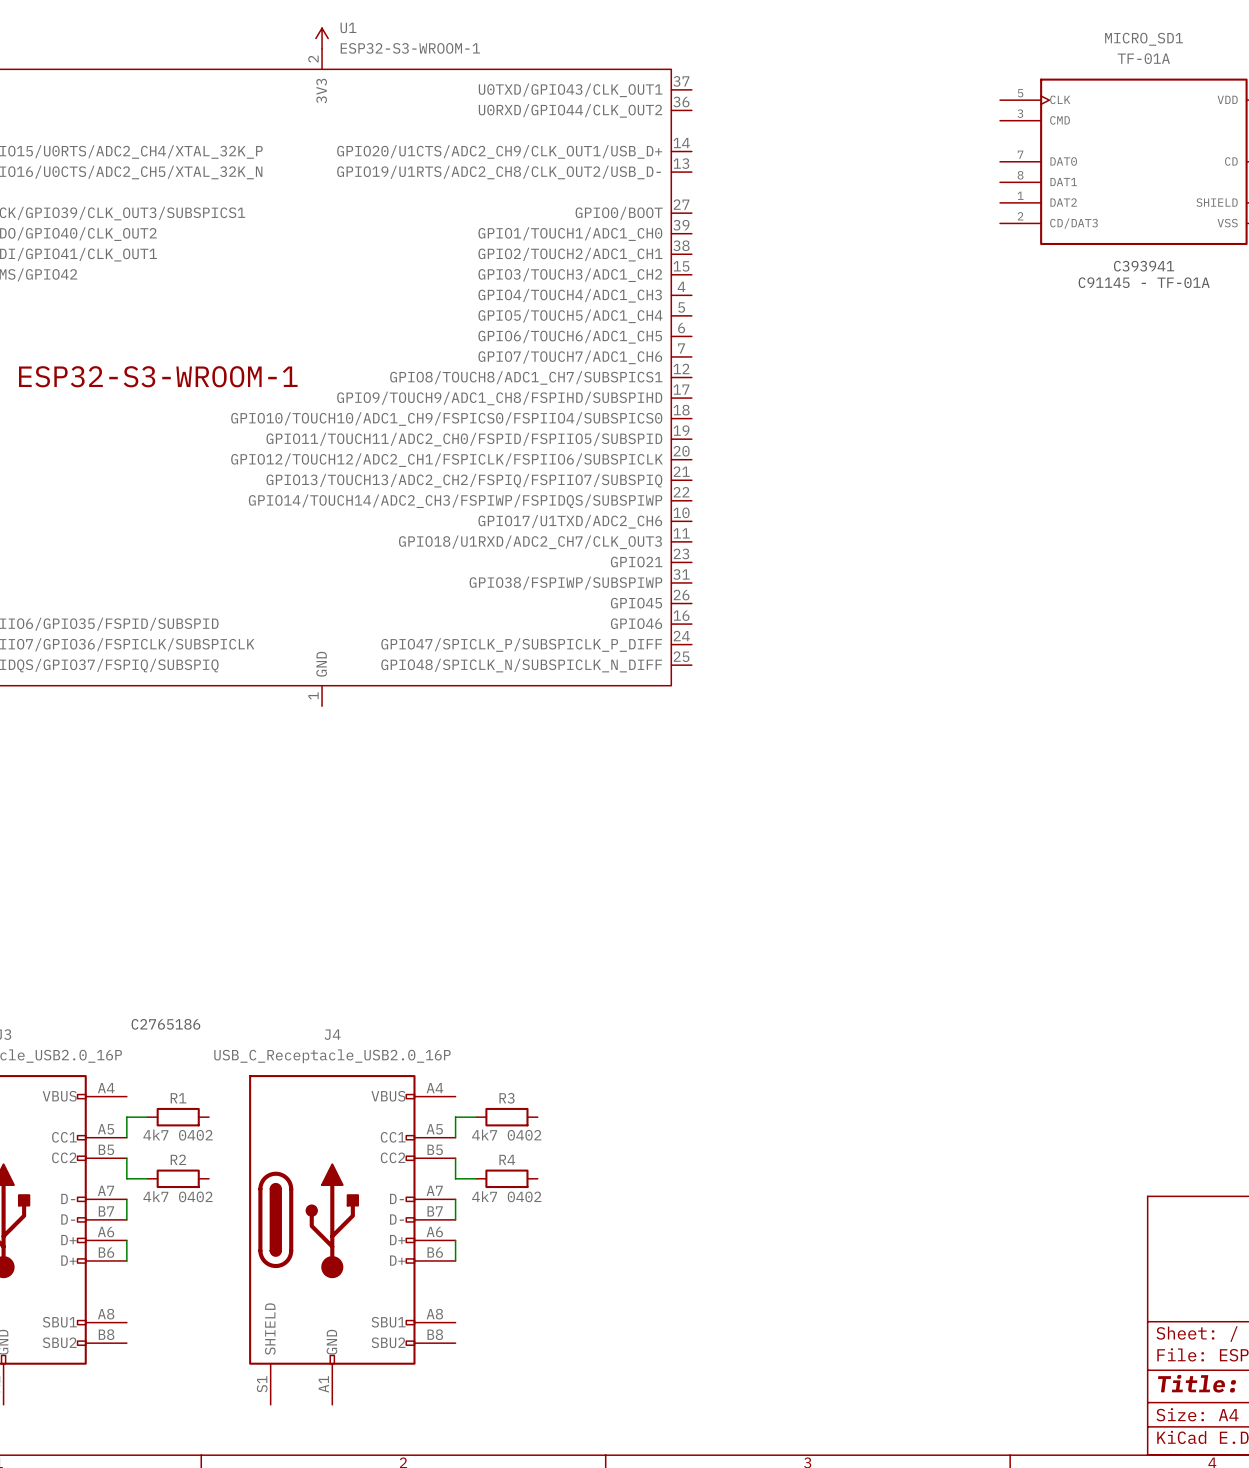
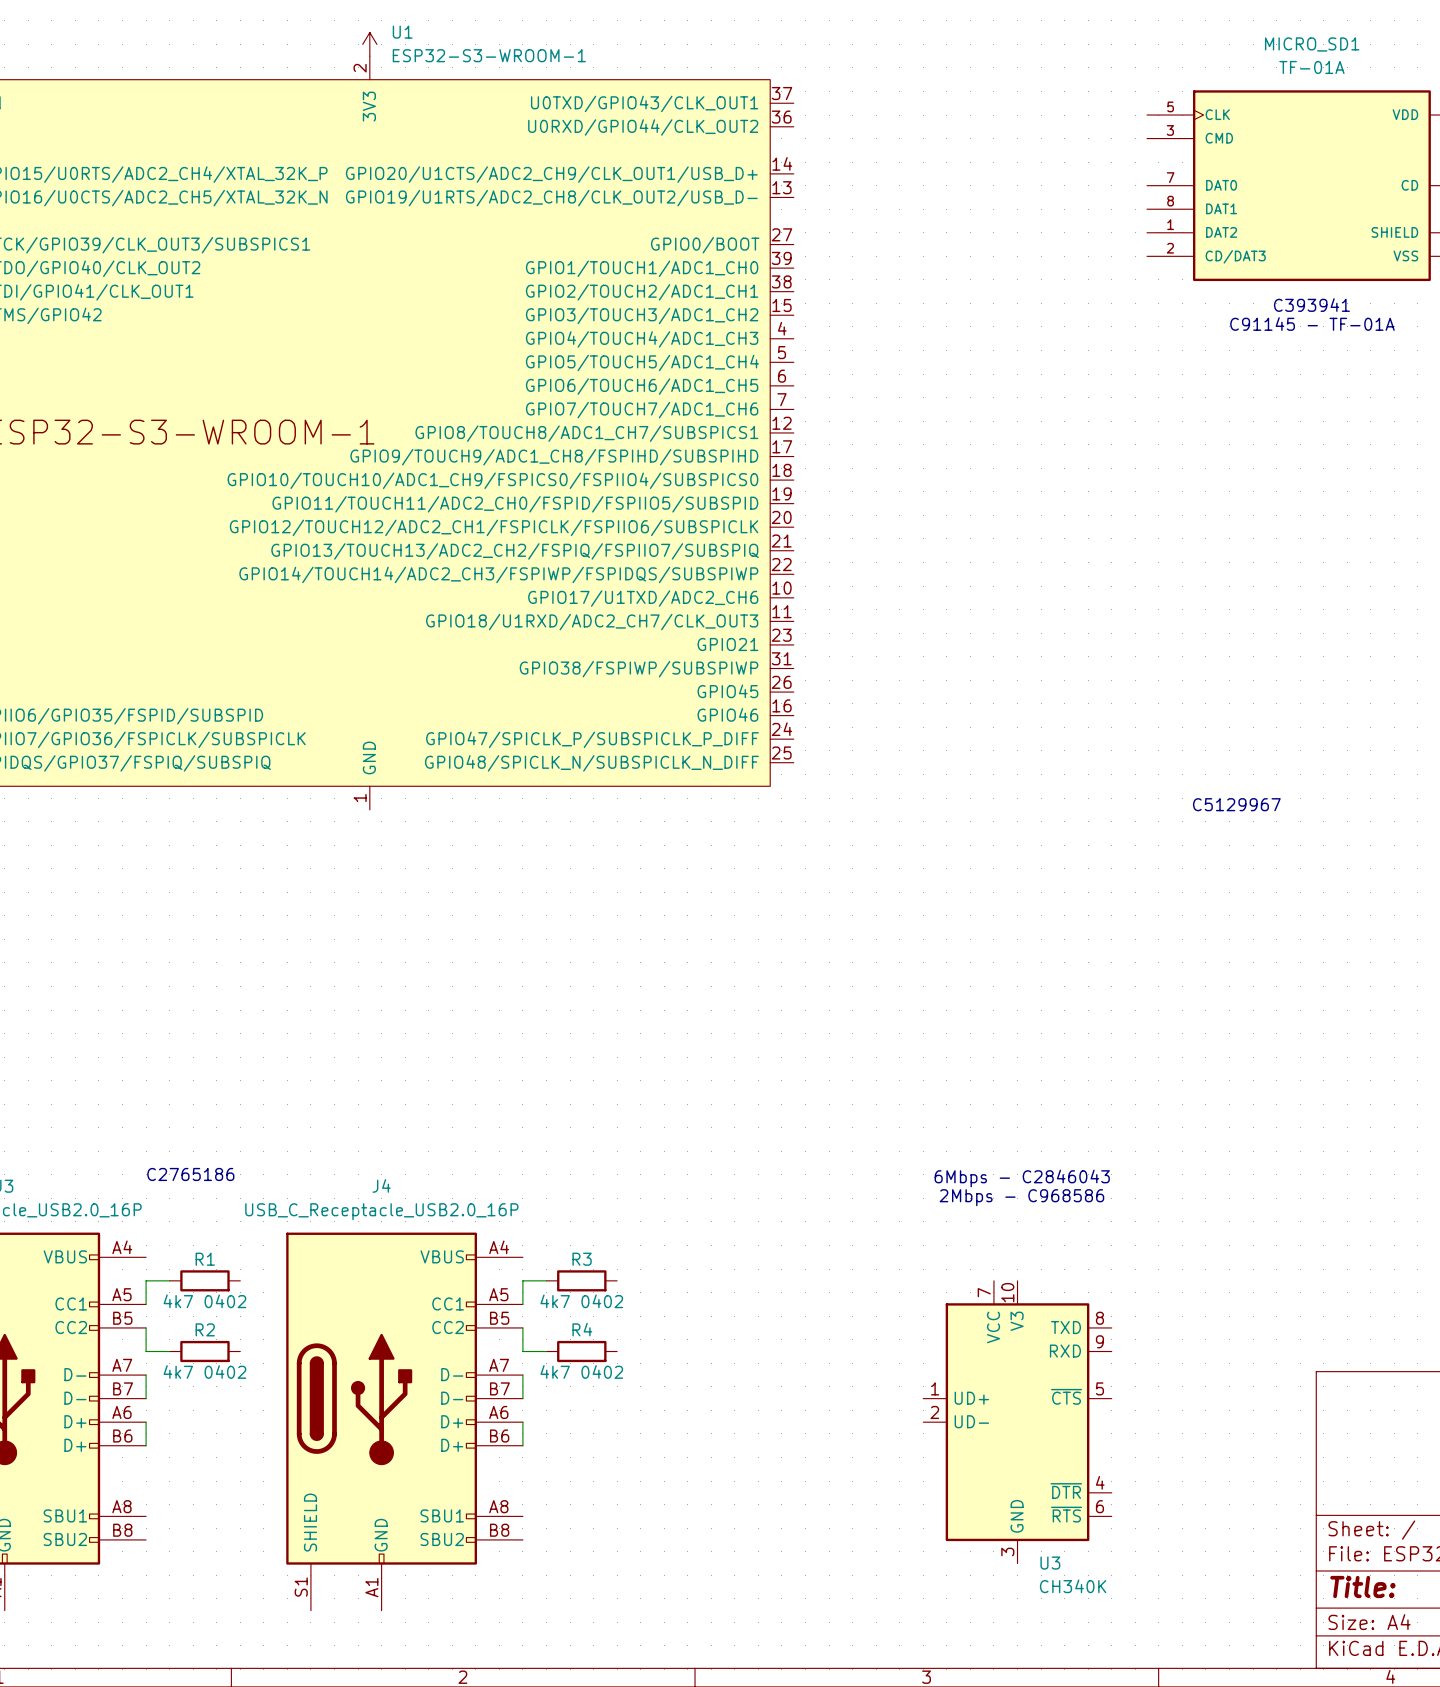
text: none -> C5129967 (1236, 804)
text: none -> 6Mbps - C2846043 (1022, 1178)
text: none -> 2Mbps - C968586 (1021, 1197)
U3: none -> CH340K (1017, 1422)

